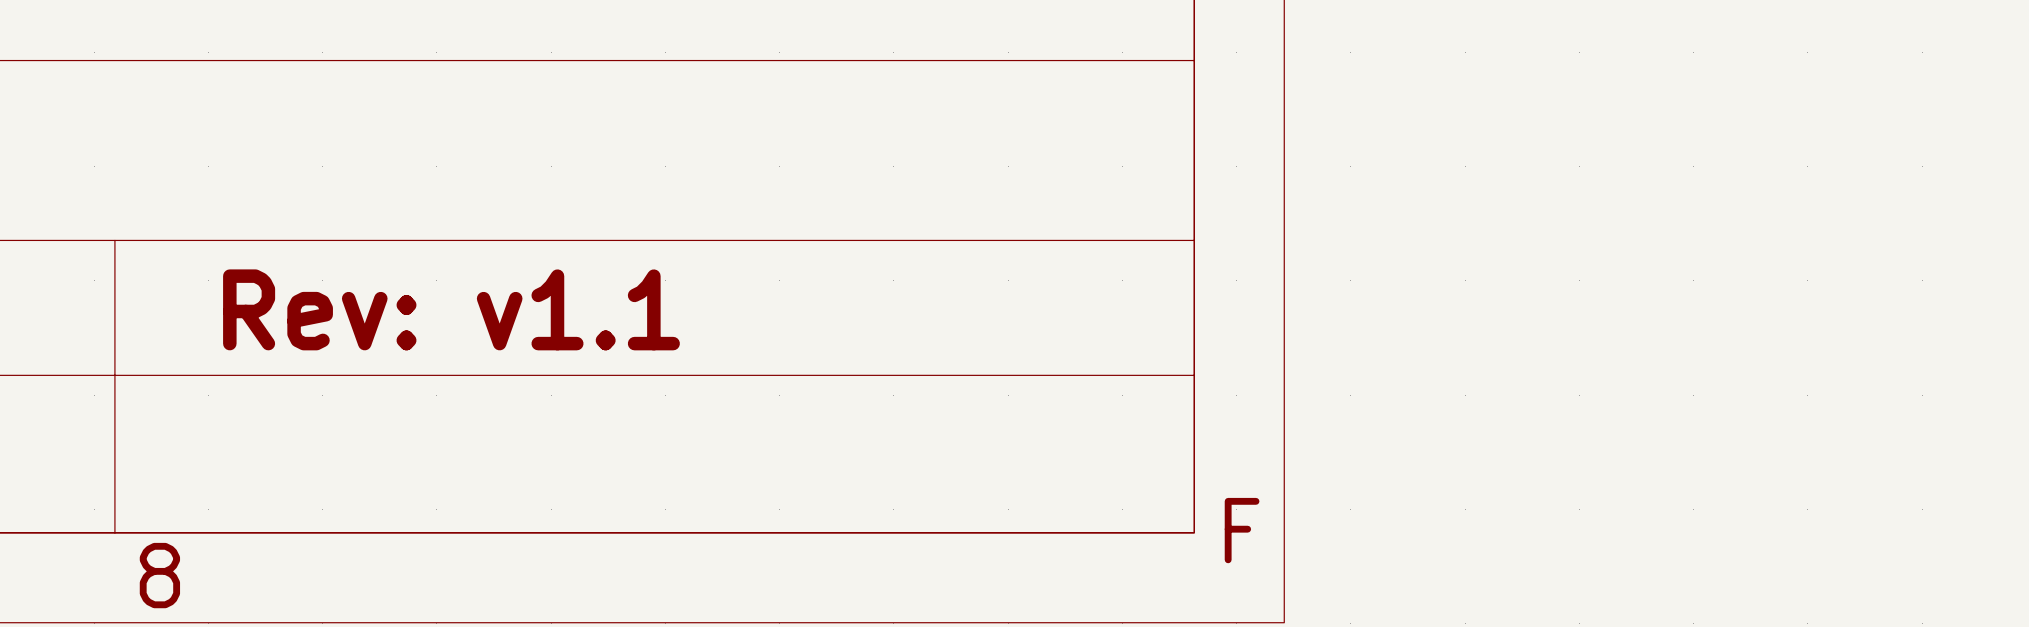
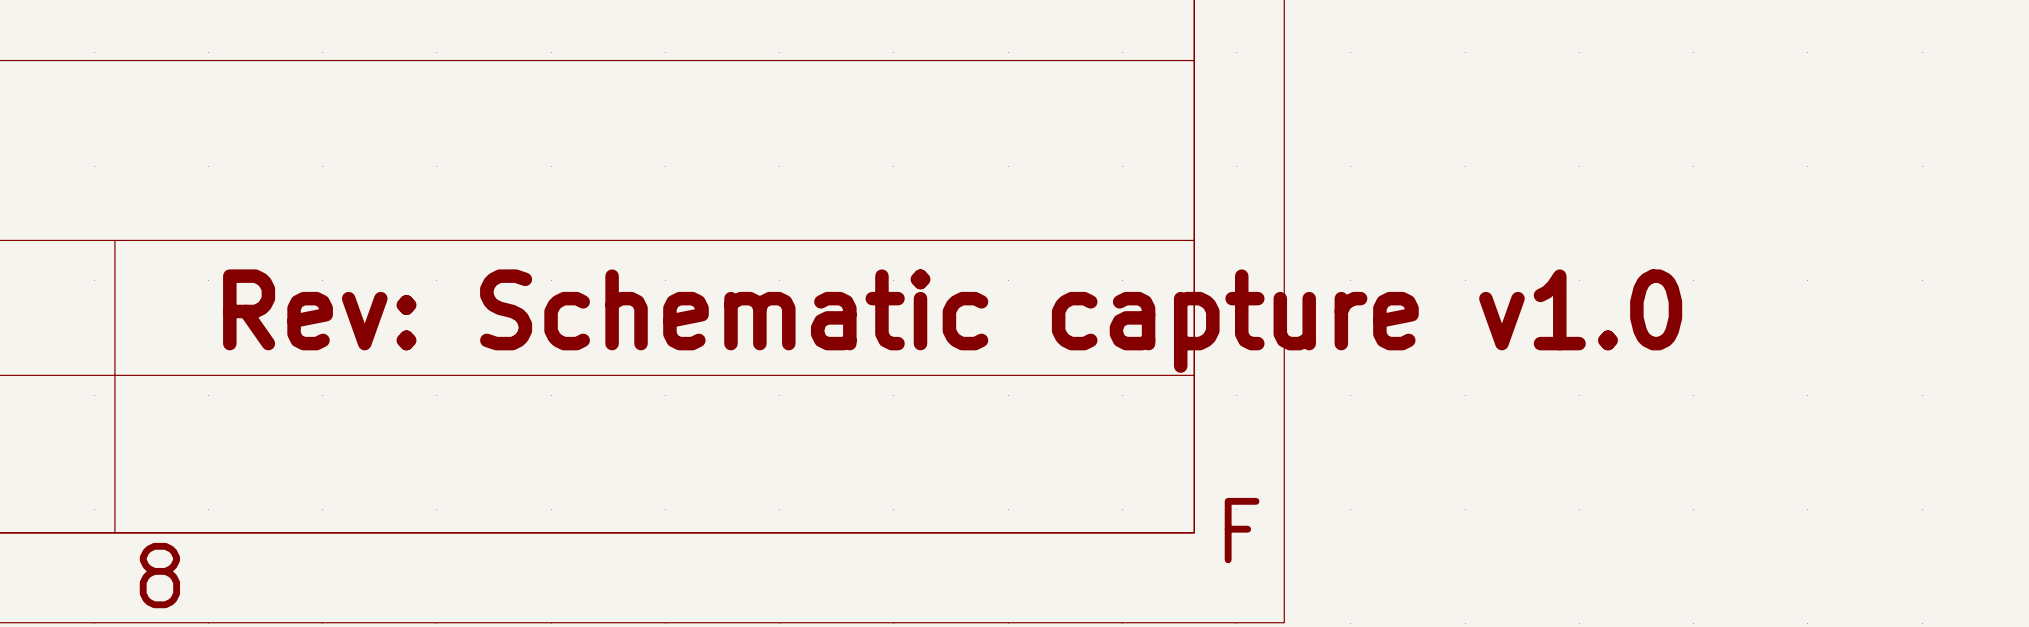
title block: Rev: v1.1 (451, 309) -> Rev: Schematic capture v1.0 (952, 321)

